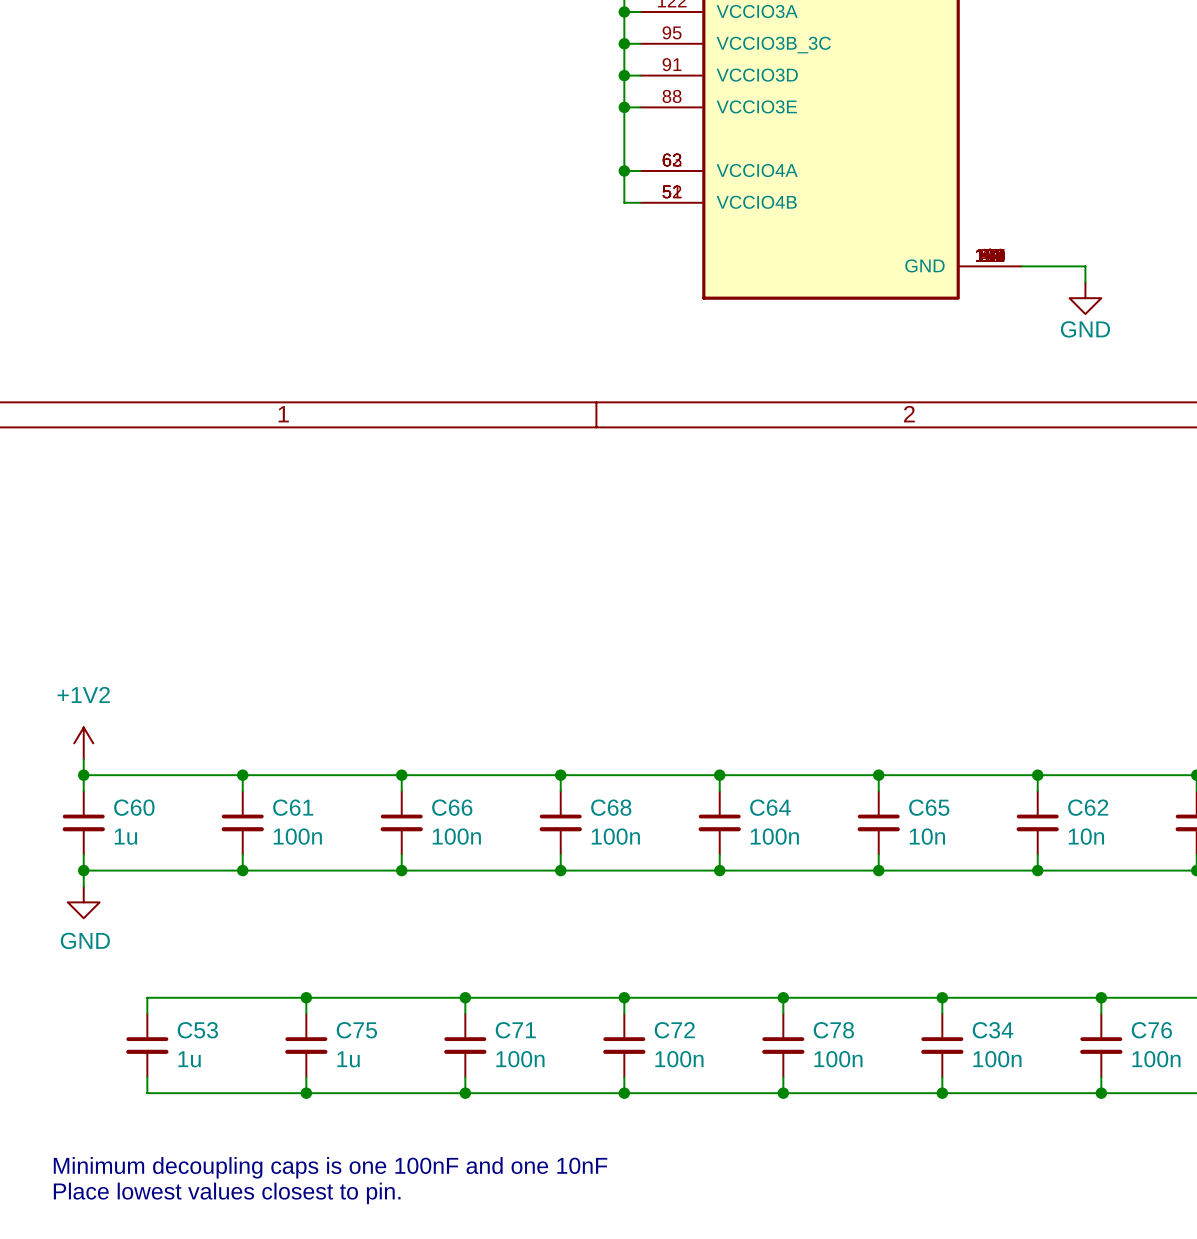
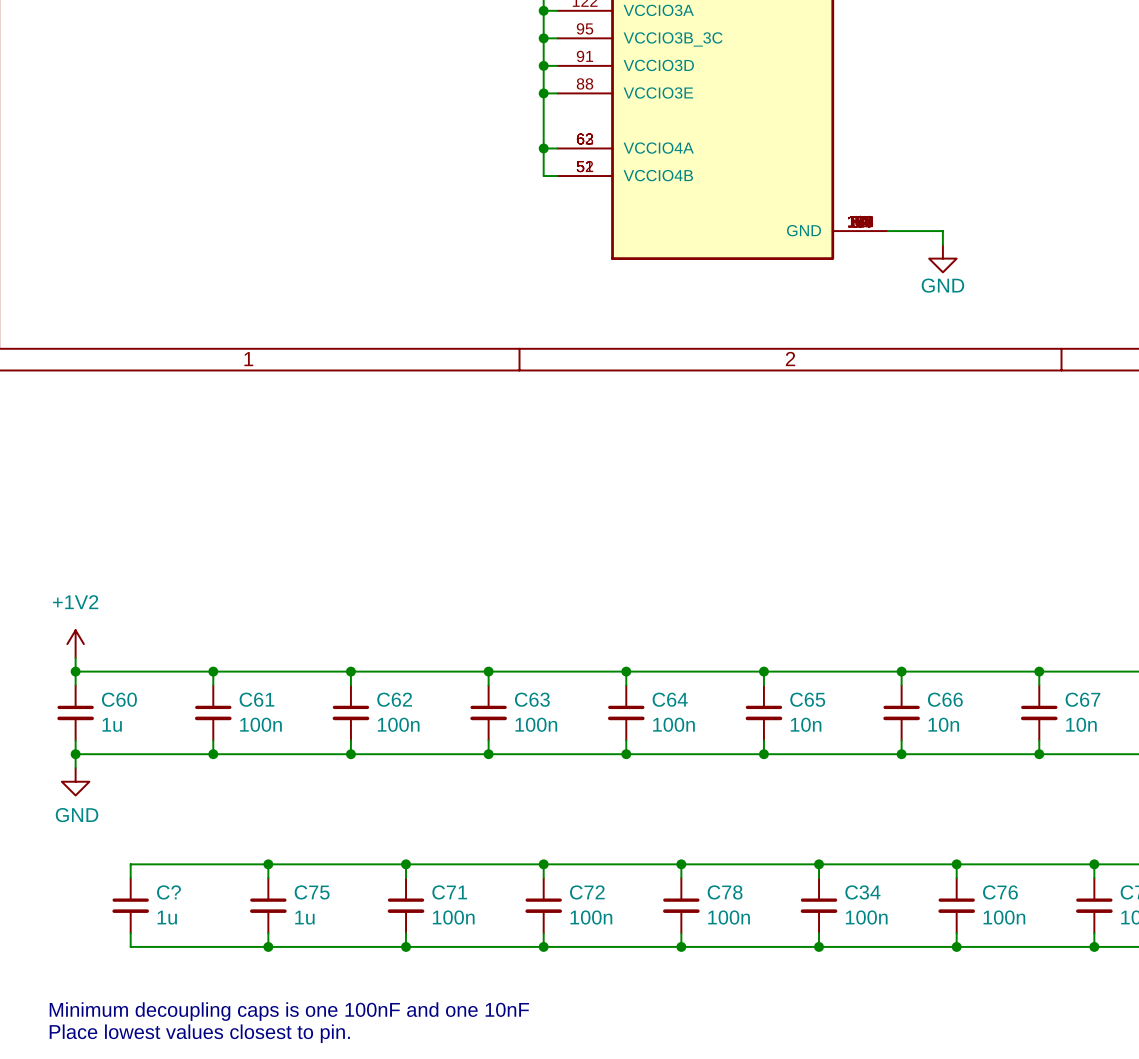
C66 name: C66 (452, 807) -> C62 (394, 699)
C68 name: C68 (611, 807) -> C63 (532, 699)
C62 name: C62 (1088, 807) -> C66 (945, 699)
C53 name: C53 (197, 1030) -> C? (168, 892)

